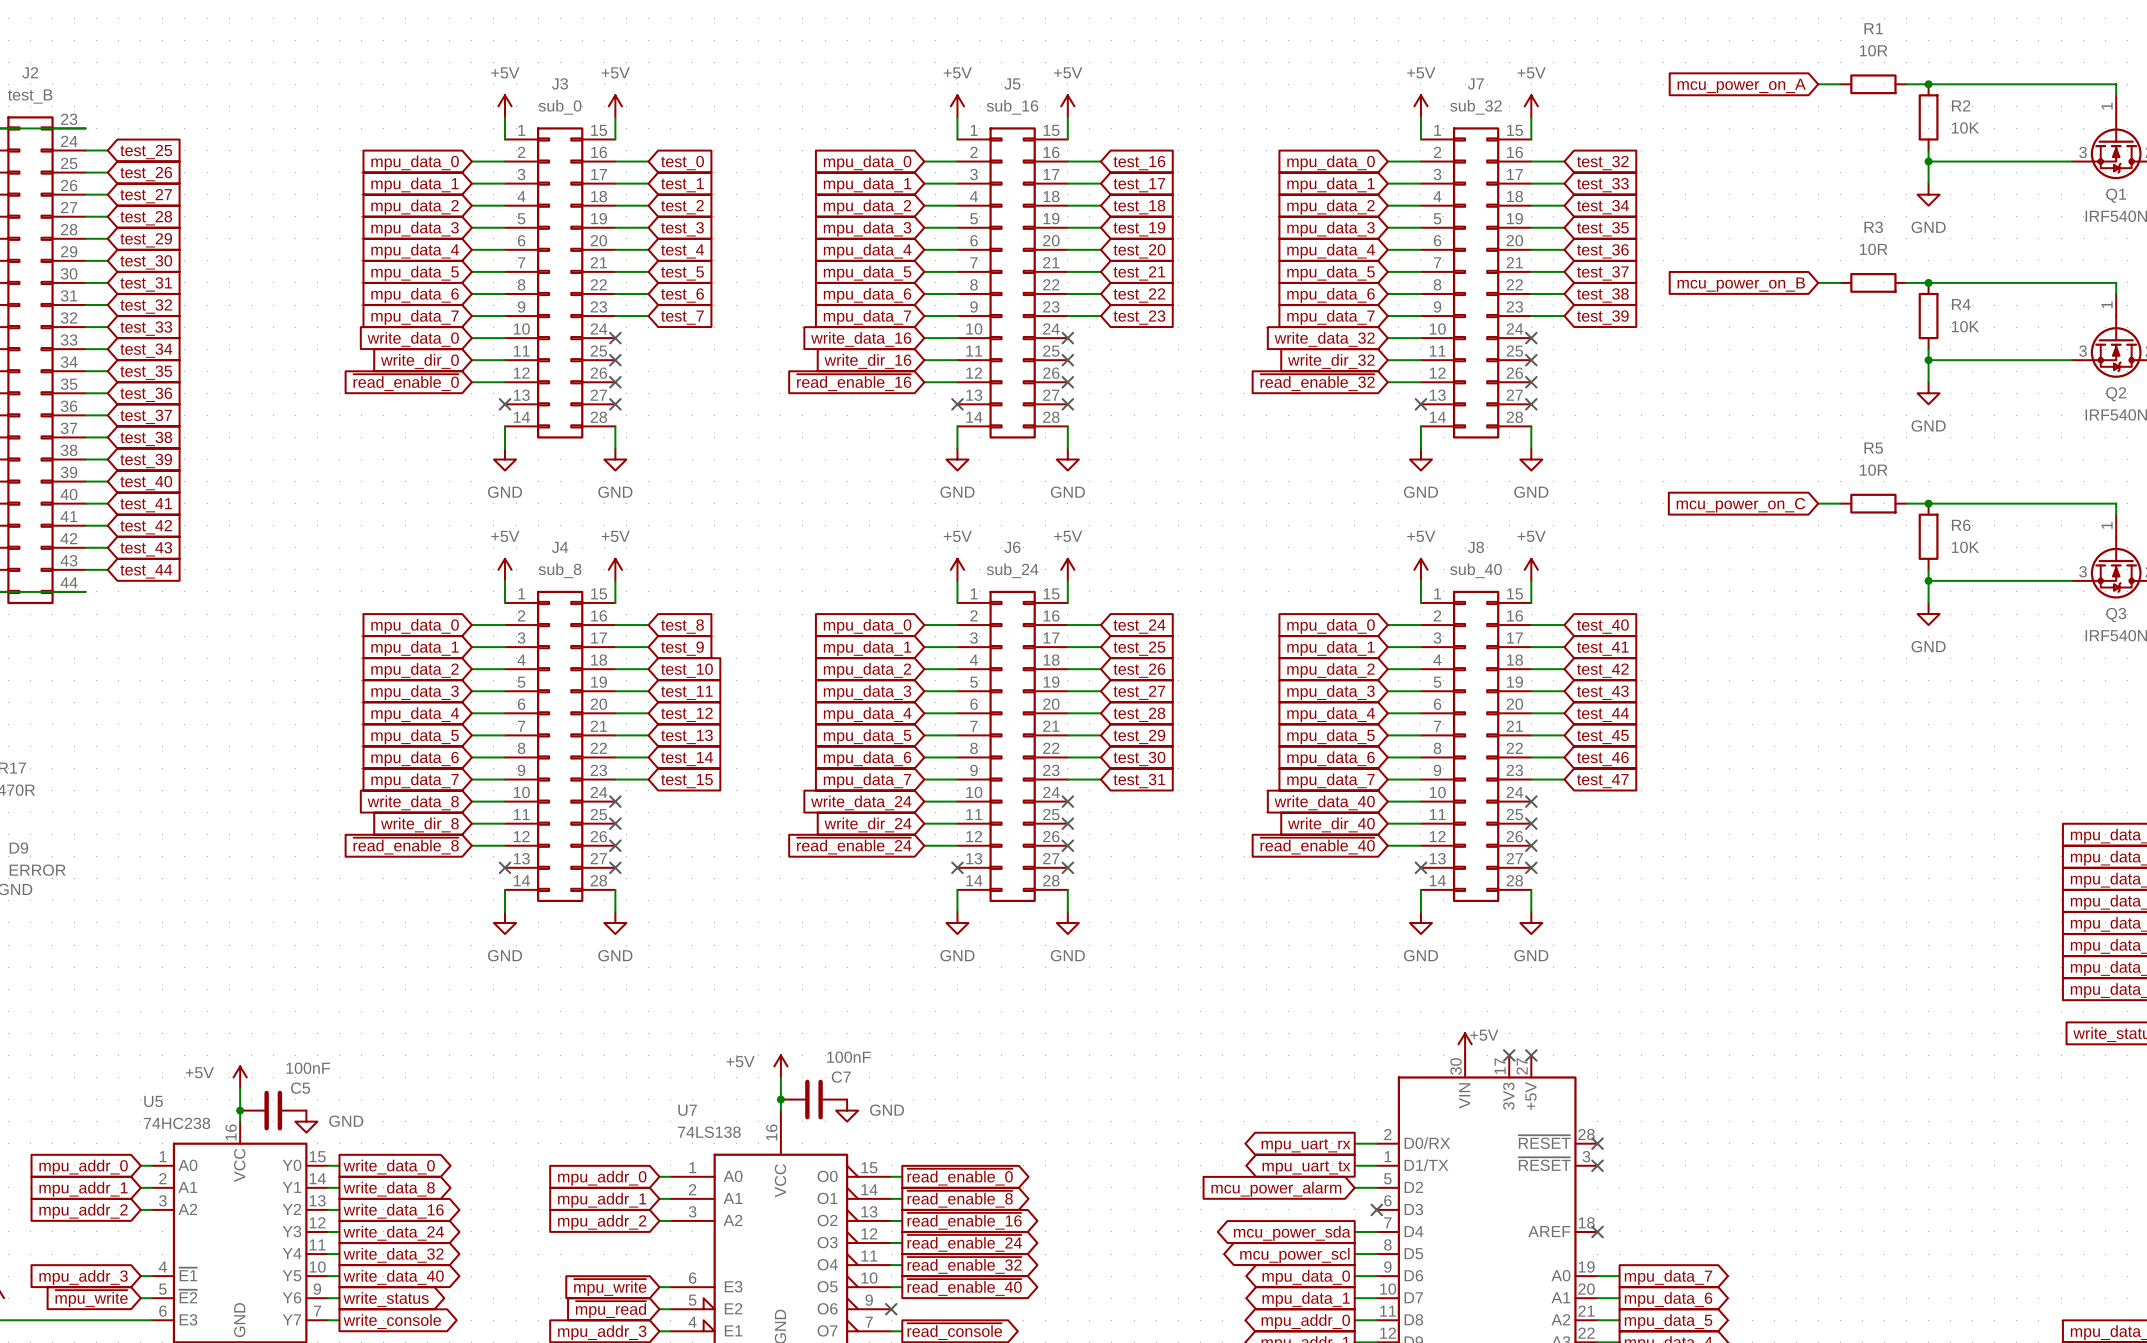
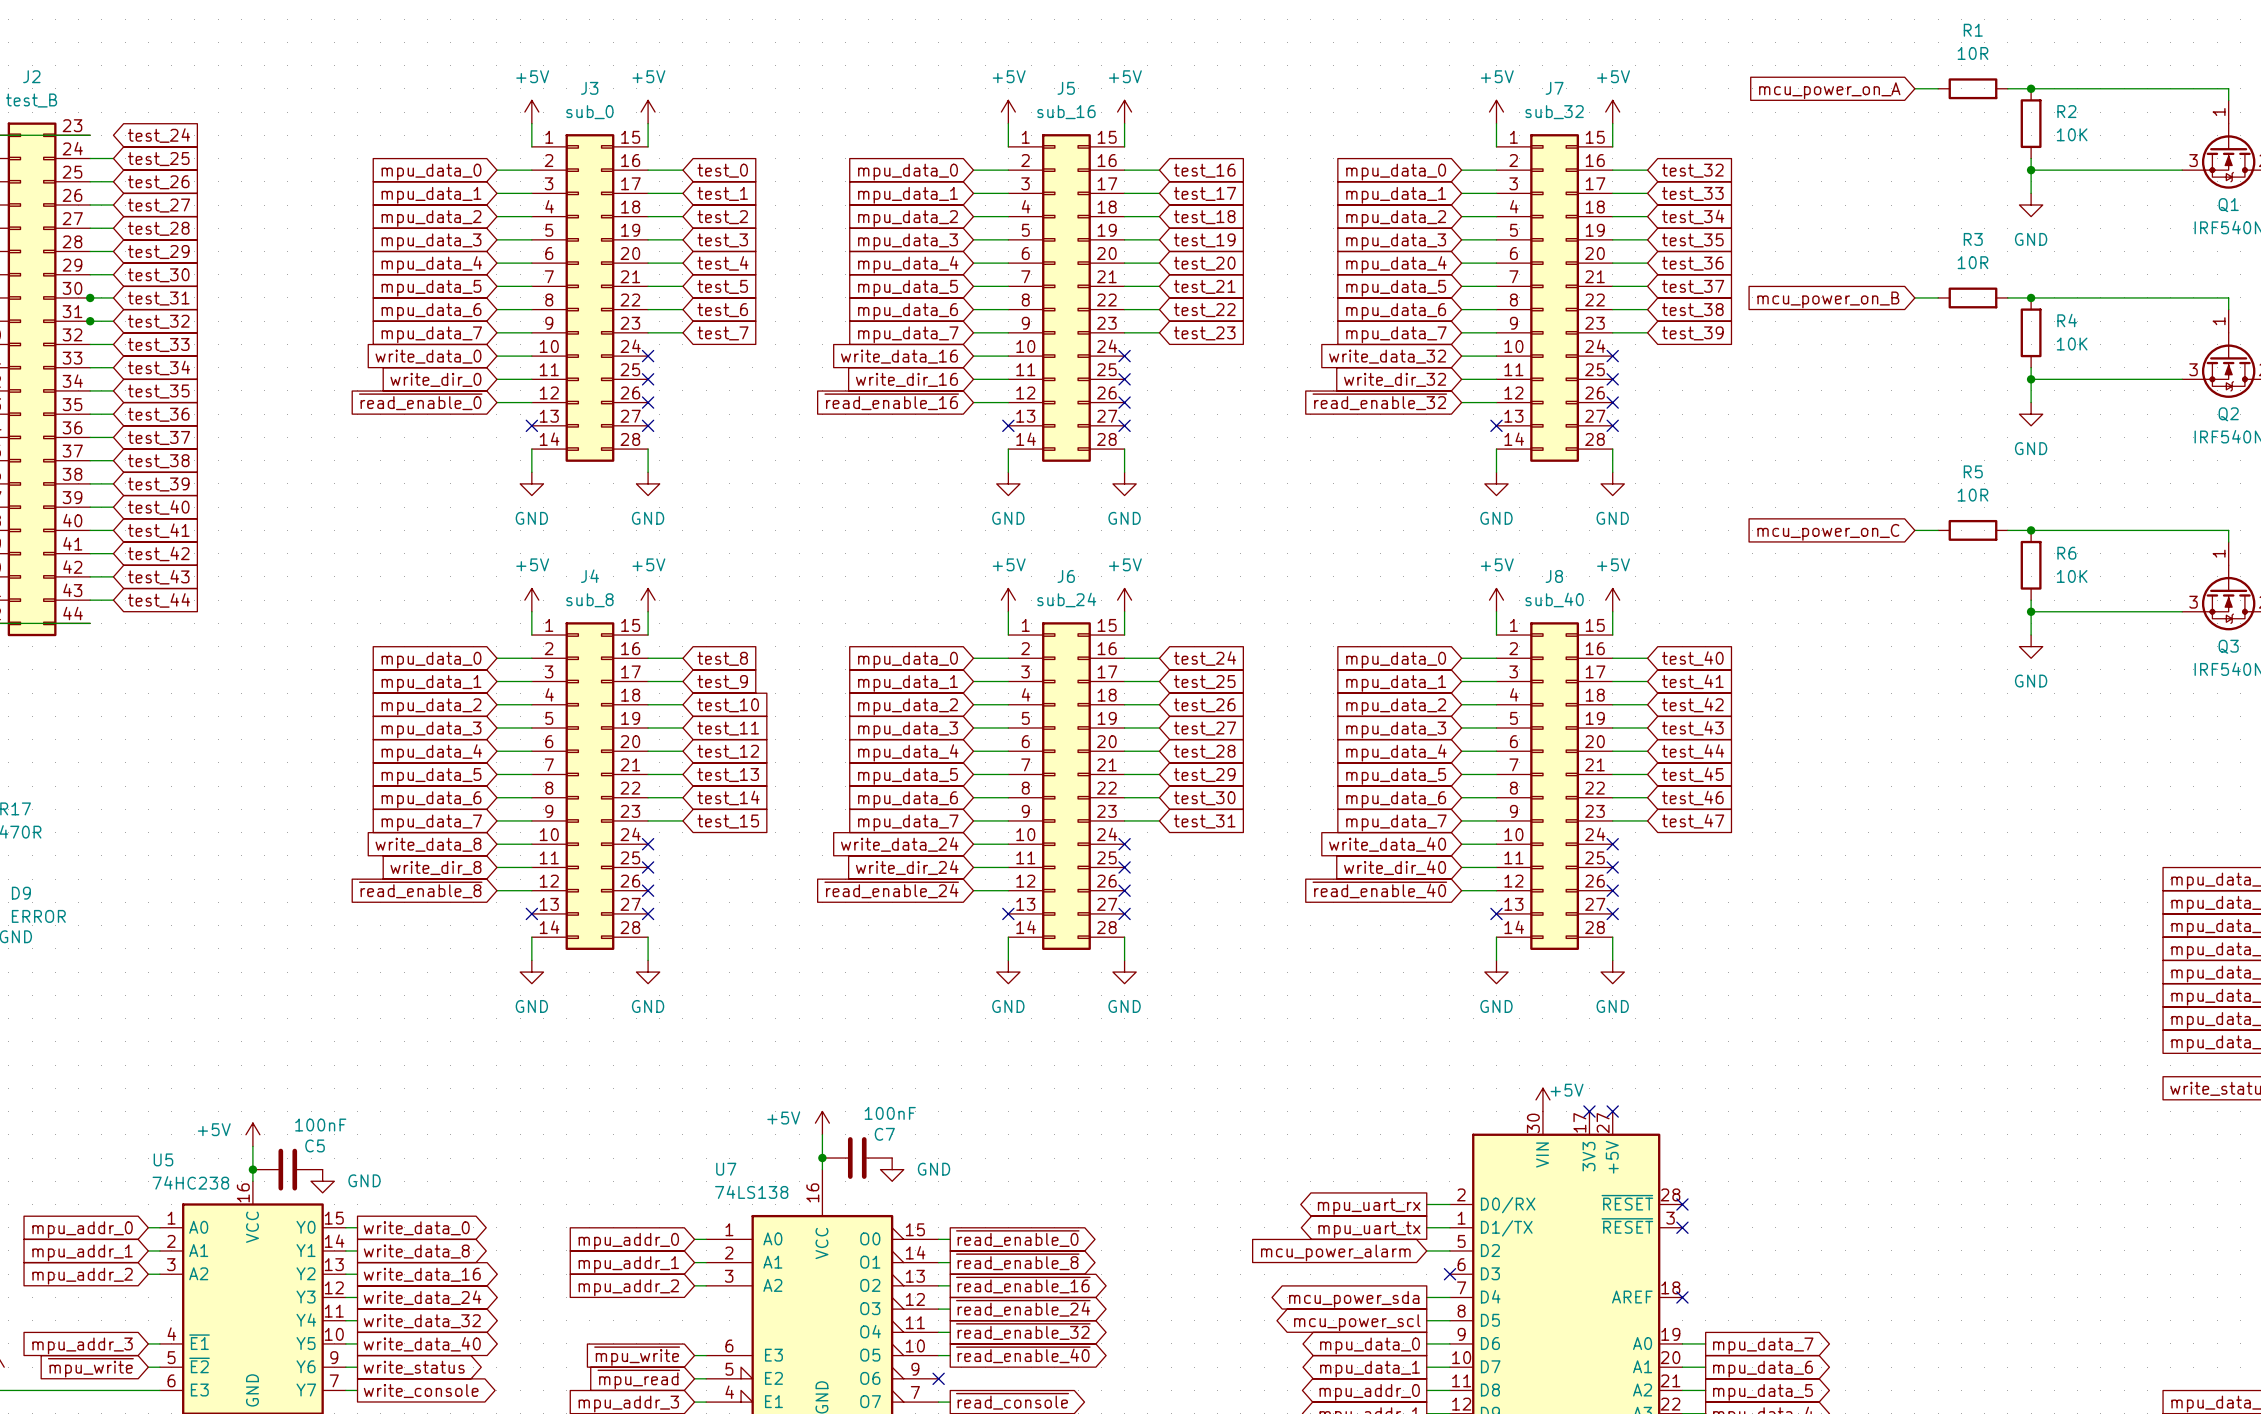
global label: none -> test_24 (158, 135)
junction: none -> (90, 297)
junction: none -> (90, 321)

